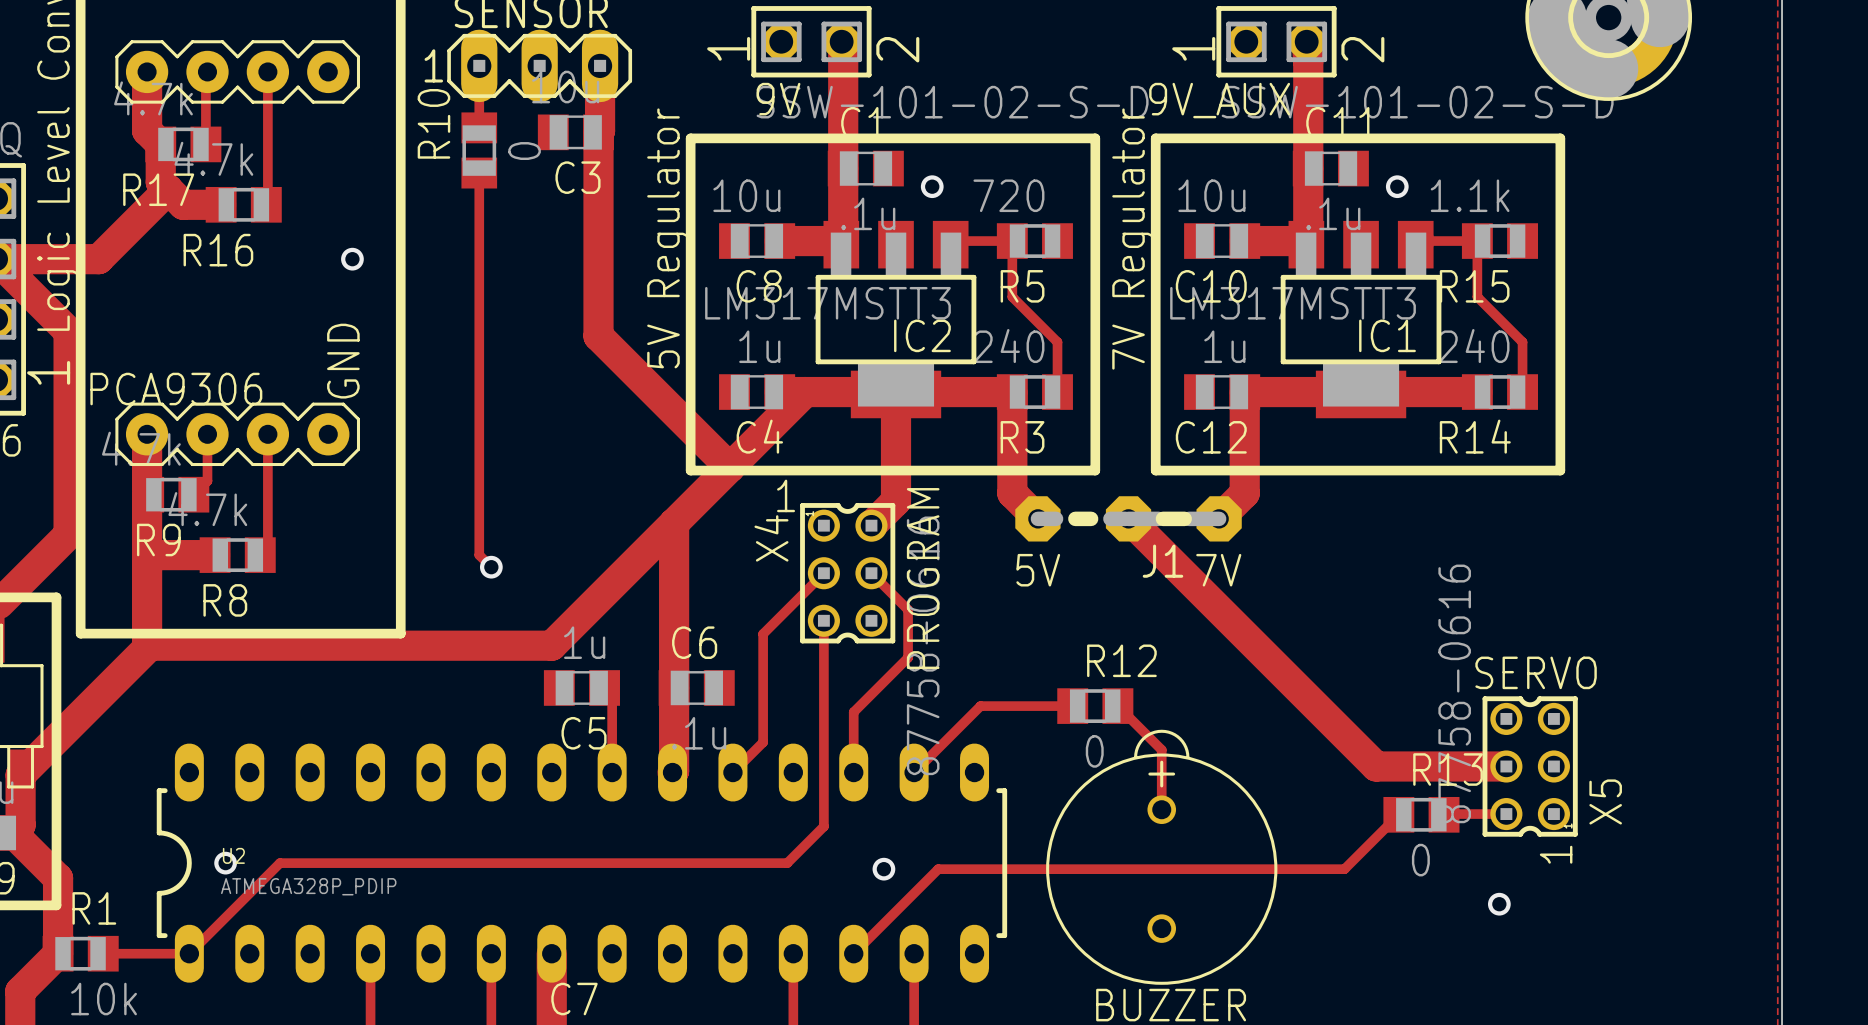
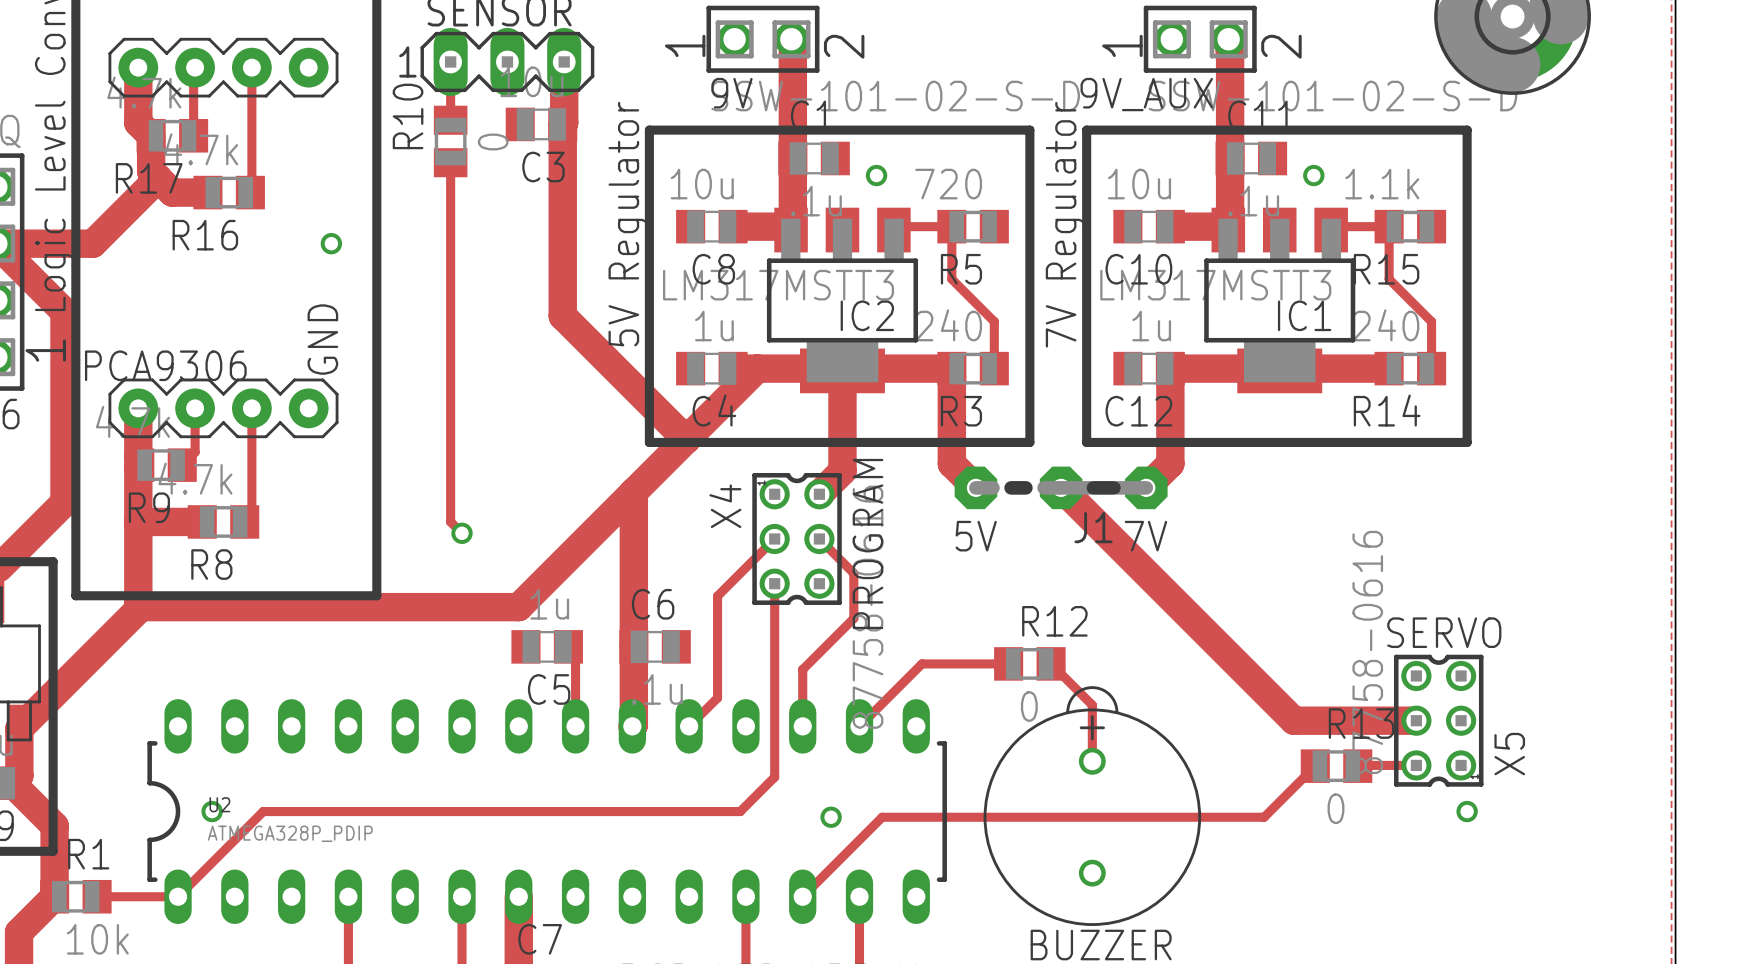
text: 1 (786, 495) -> none
text: 1 (1556, 854) -> none
via position: (1499, 904) -> (1467, 811)

